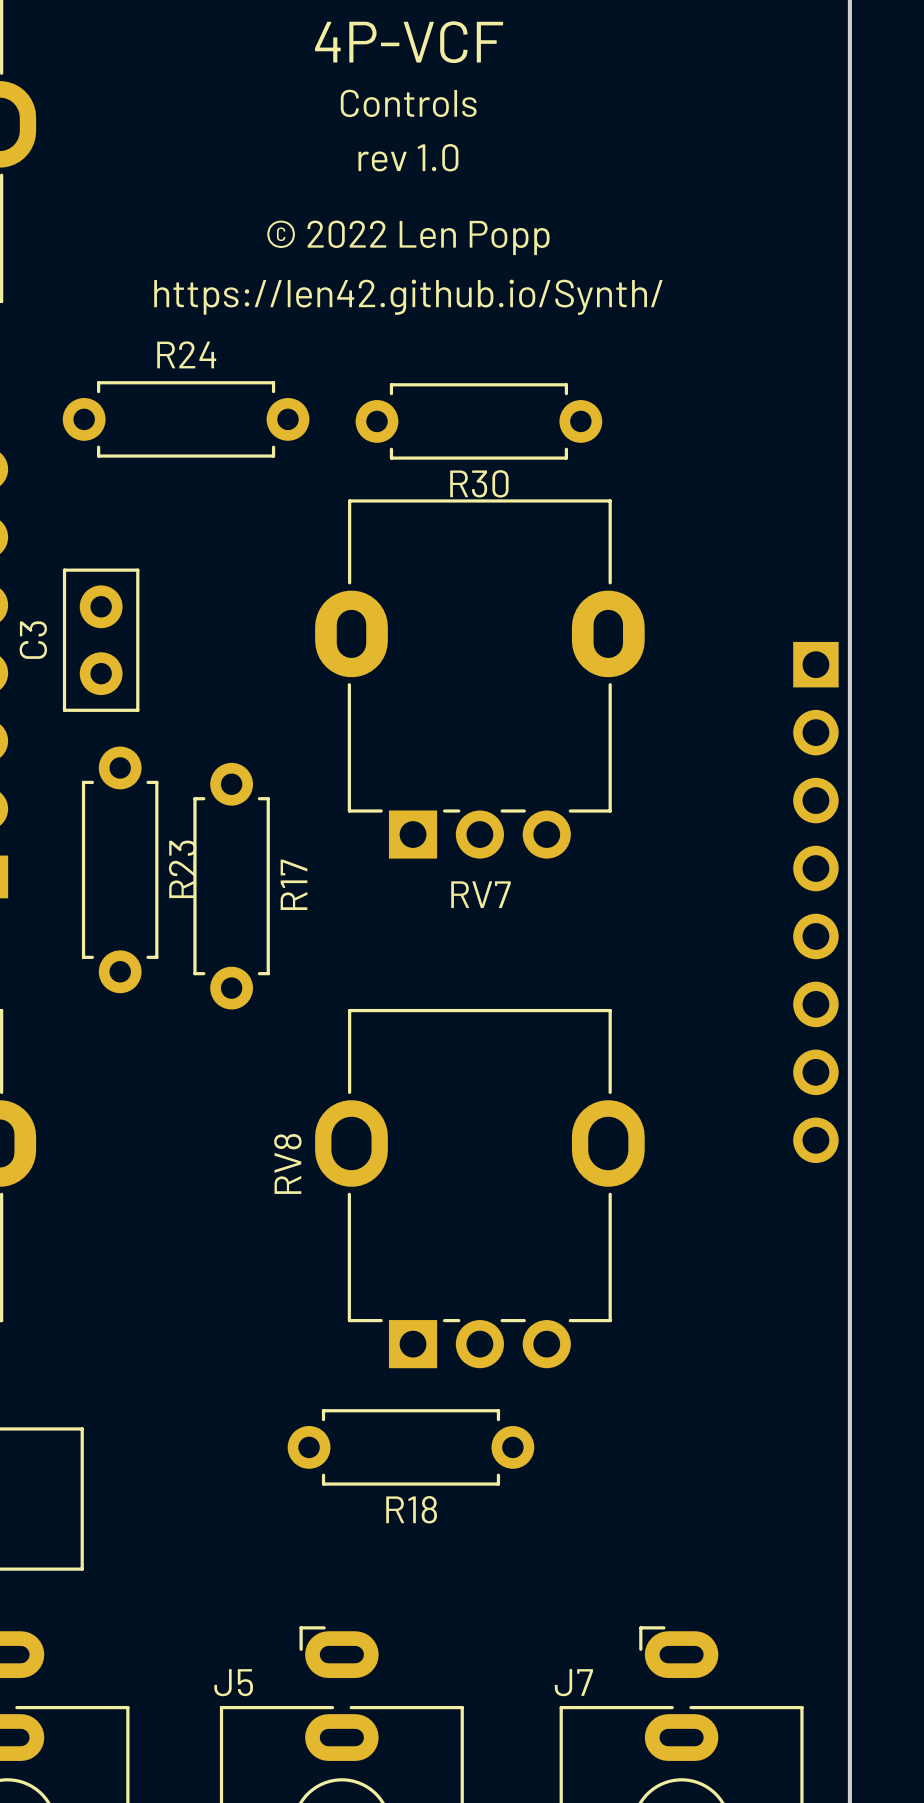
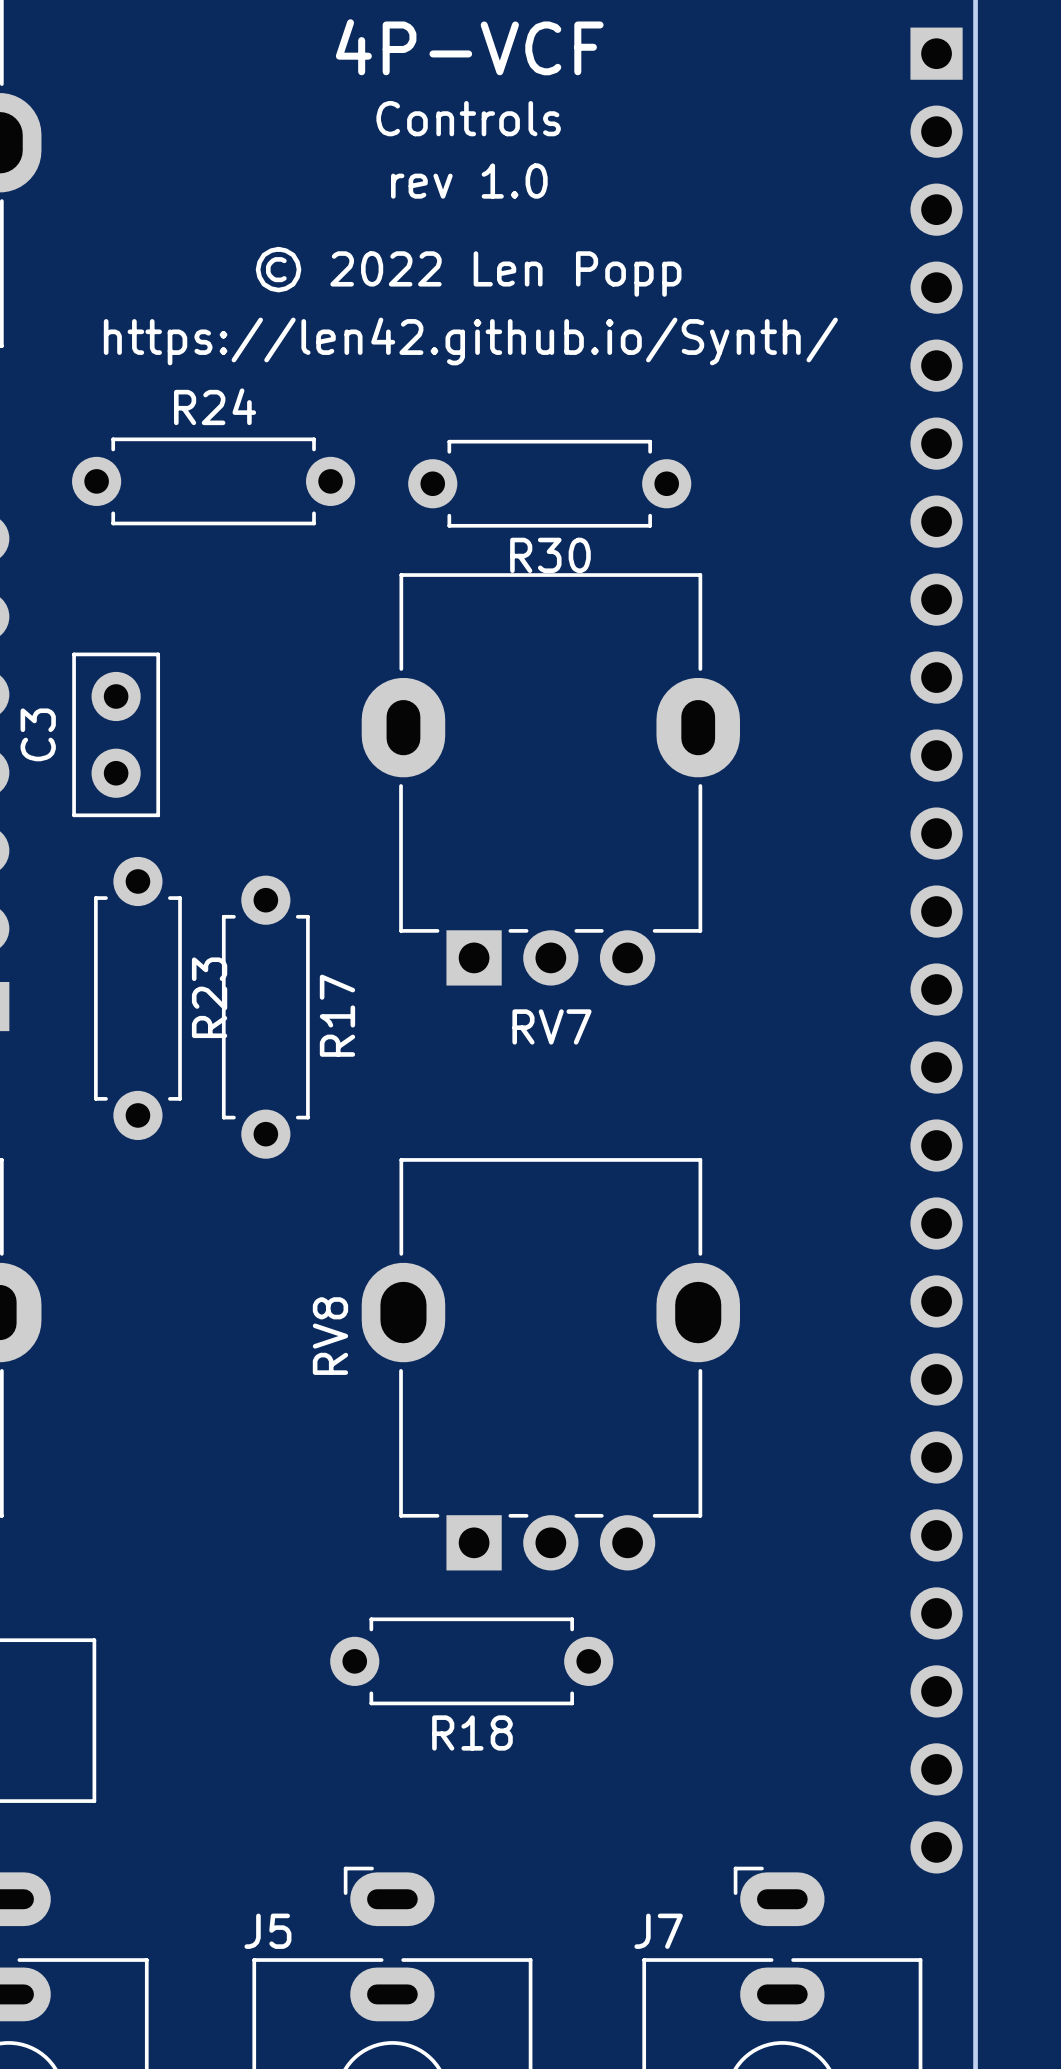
part: none -> (936, 950)
part: (815, 902) -> none

